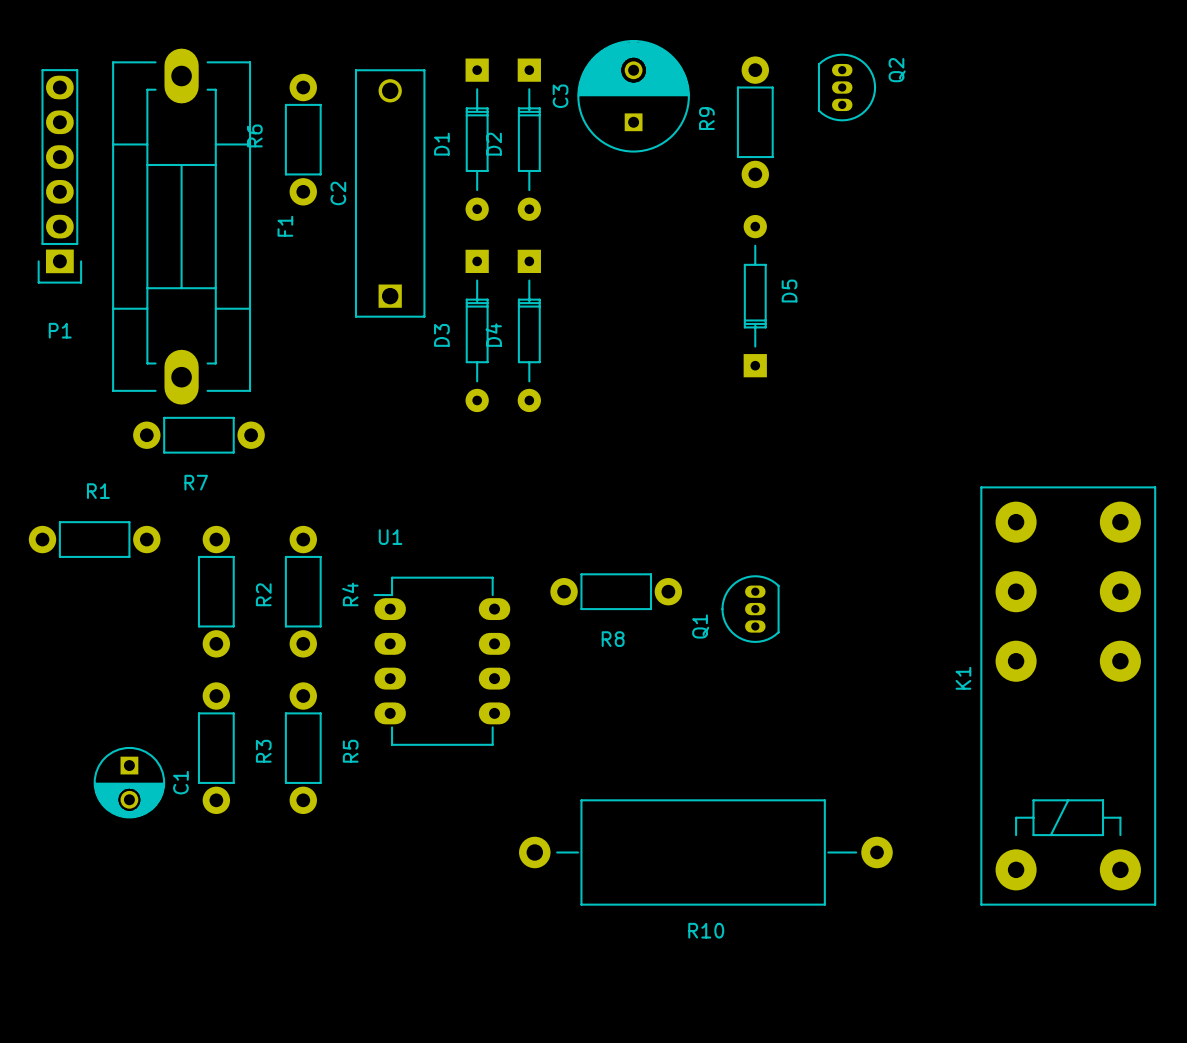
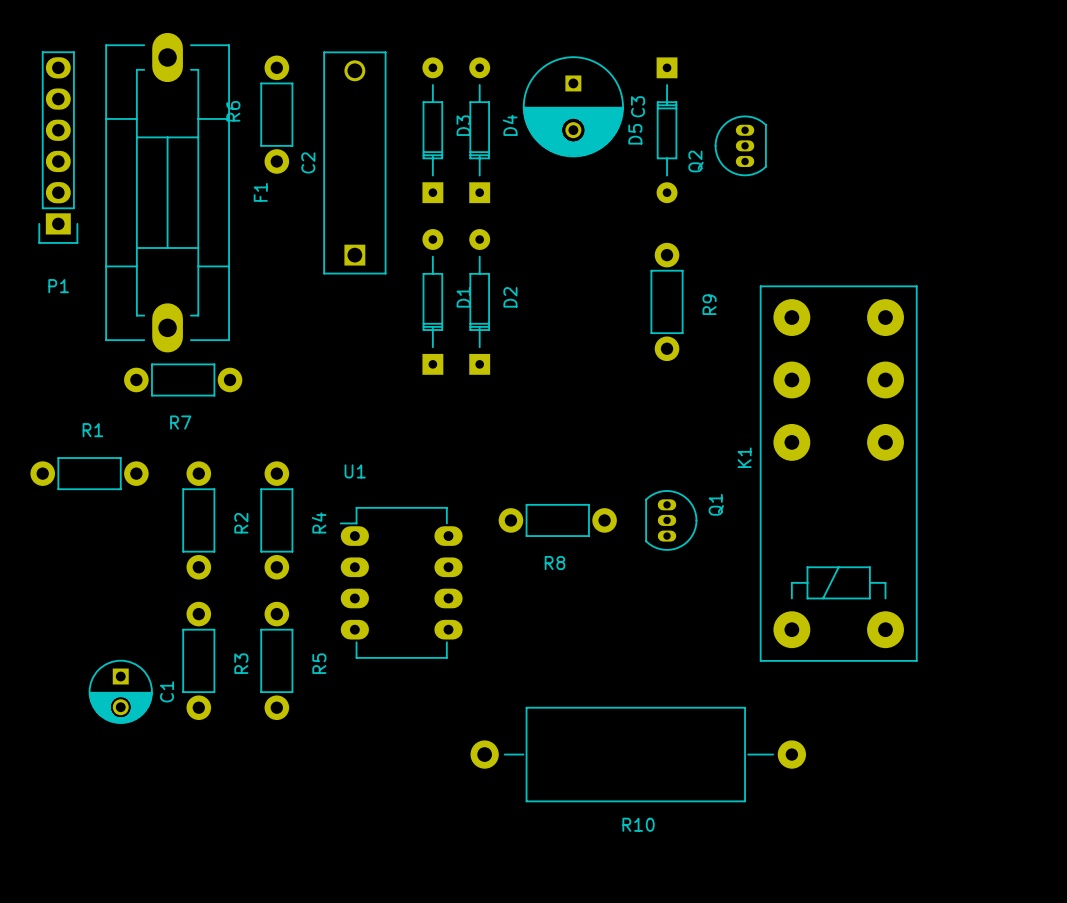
Q2 rotation: 0° (847, 87) -> 180° (740, 145)
Q2 position: (847, 87) -> (740, 145)
C3 rotation: 0° (633, 96) -> 180° (573, 106)
R9 name position: R9 (706, 118) -> R9 (709, 304)
R9 position: (755, 122) -> (667, 301)
D1 rotation: 0° (477, 139) -> 180° (432, 301)
D1 position: (477, 139) -> (432, 301)
D2 rotation: 0° (529, 139) -> 180° (479, 301)
D2 position: (529, 139) -> (479, 301)
D5 rotation: 0° (755, 296) -> 180° (667, 130)
D5 position: (755, 296) -> (667, 130)
D3 rotation: 0° (477, 330) -> 180° (432, 130)
D3 position: (477, 330) -> (432, 130)
D4 rotation: 0° (529, 330) -> 180° (479, 130)
D4 position: (529, 330) -> (479, 130)
Q1 rotation: 0° (750, 609) -> 180° (671, 520)
K1 position: (1068, 696) -> (838, 473)

